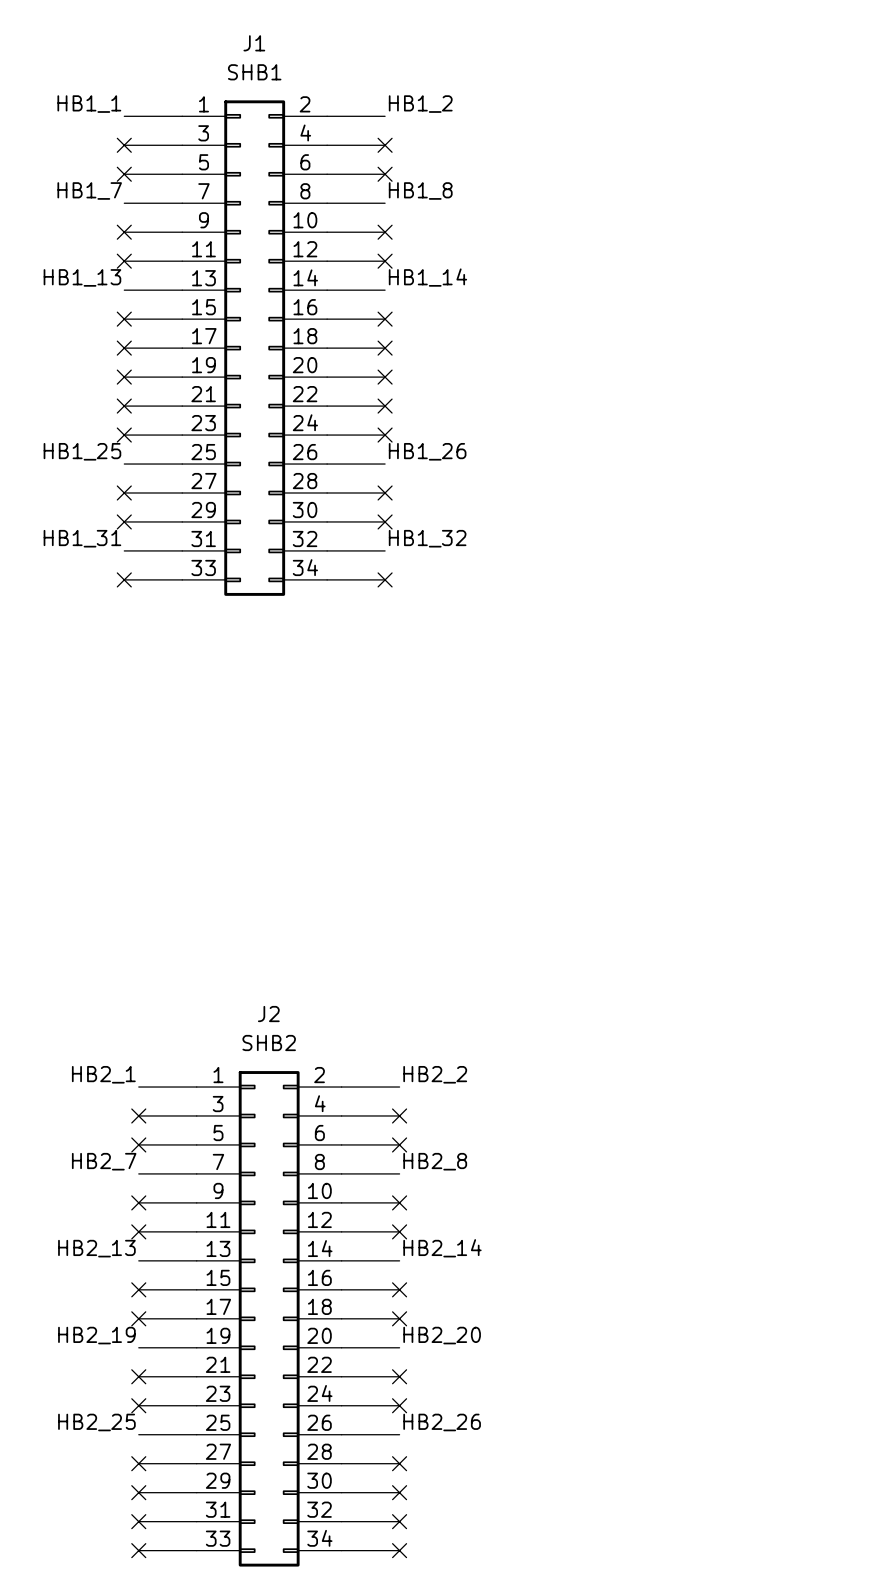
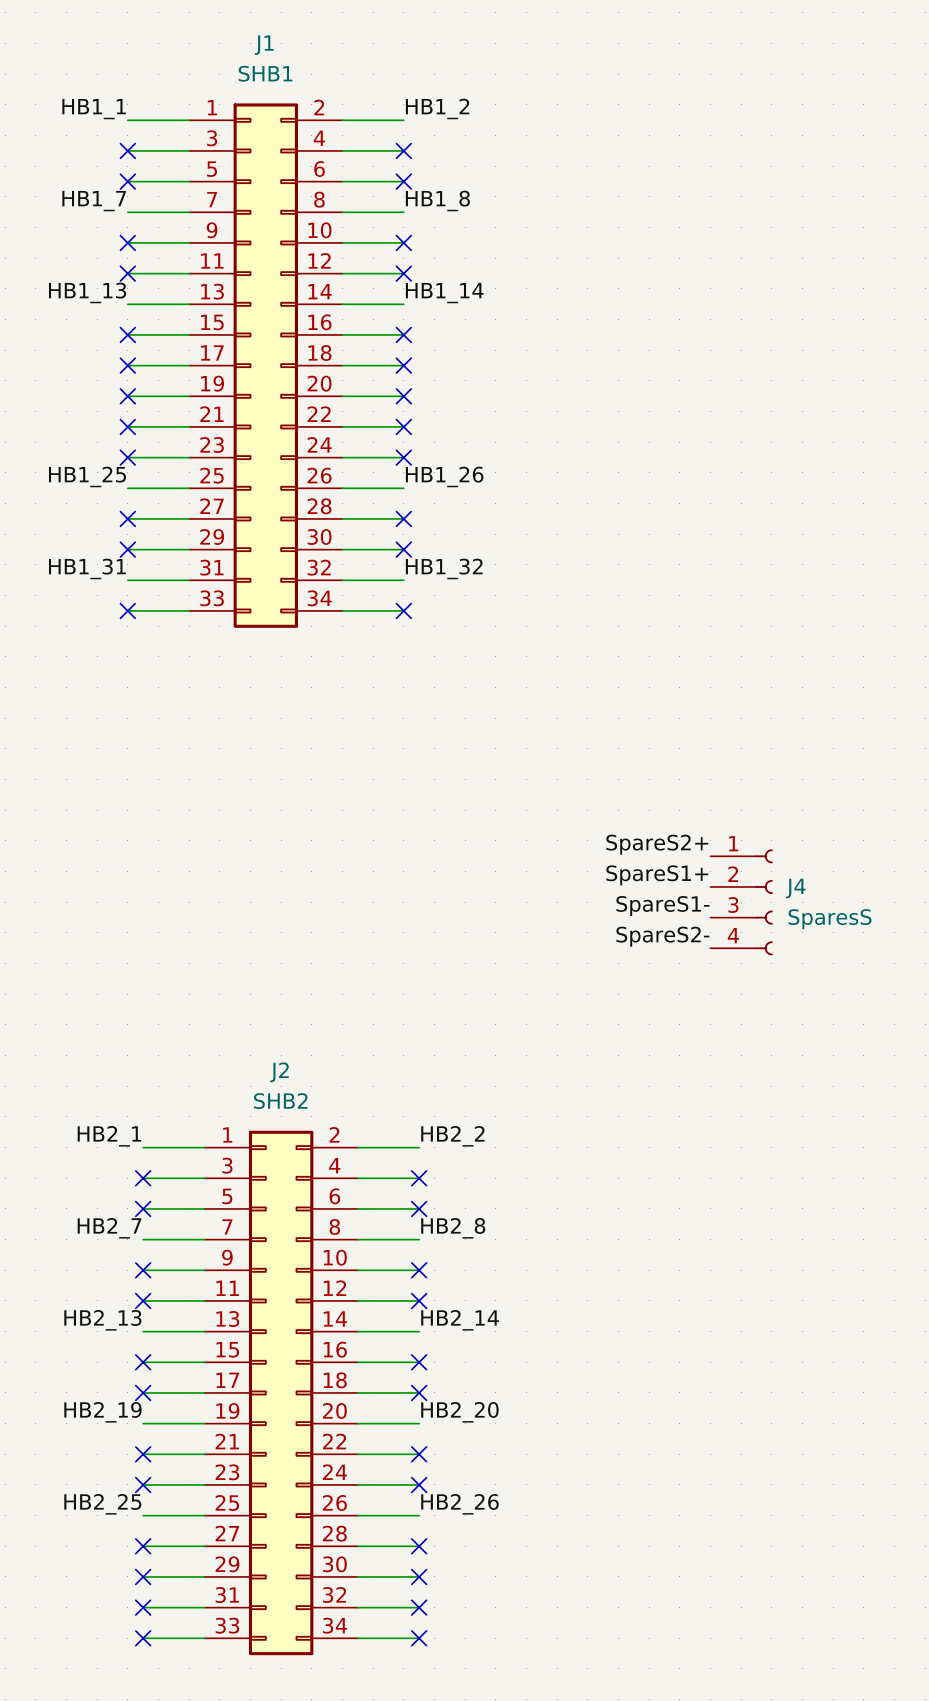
label: none -> SpareS2+ (657, 844)
label: none -> SpareS1+ (657, 875)
J4: none -> SparesS (741, 902)
label: none -> SpareS1- (662, 906)
label: none -> SpareS2- (662, 936)

